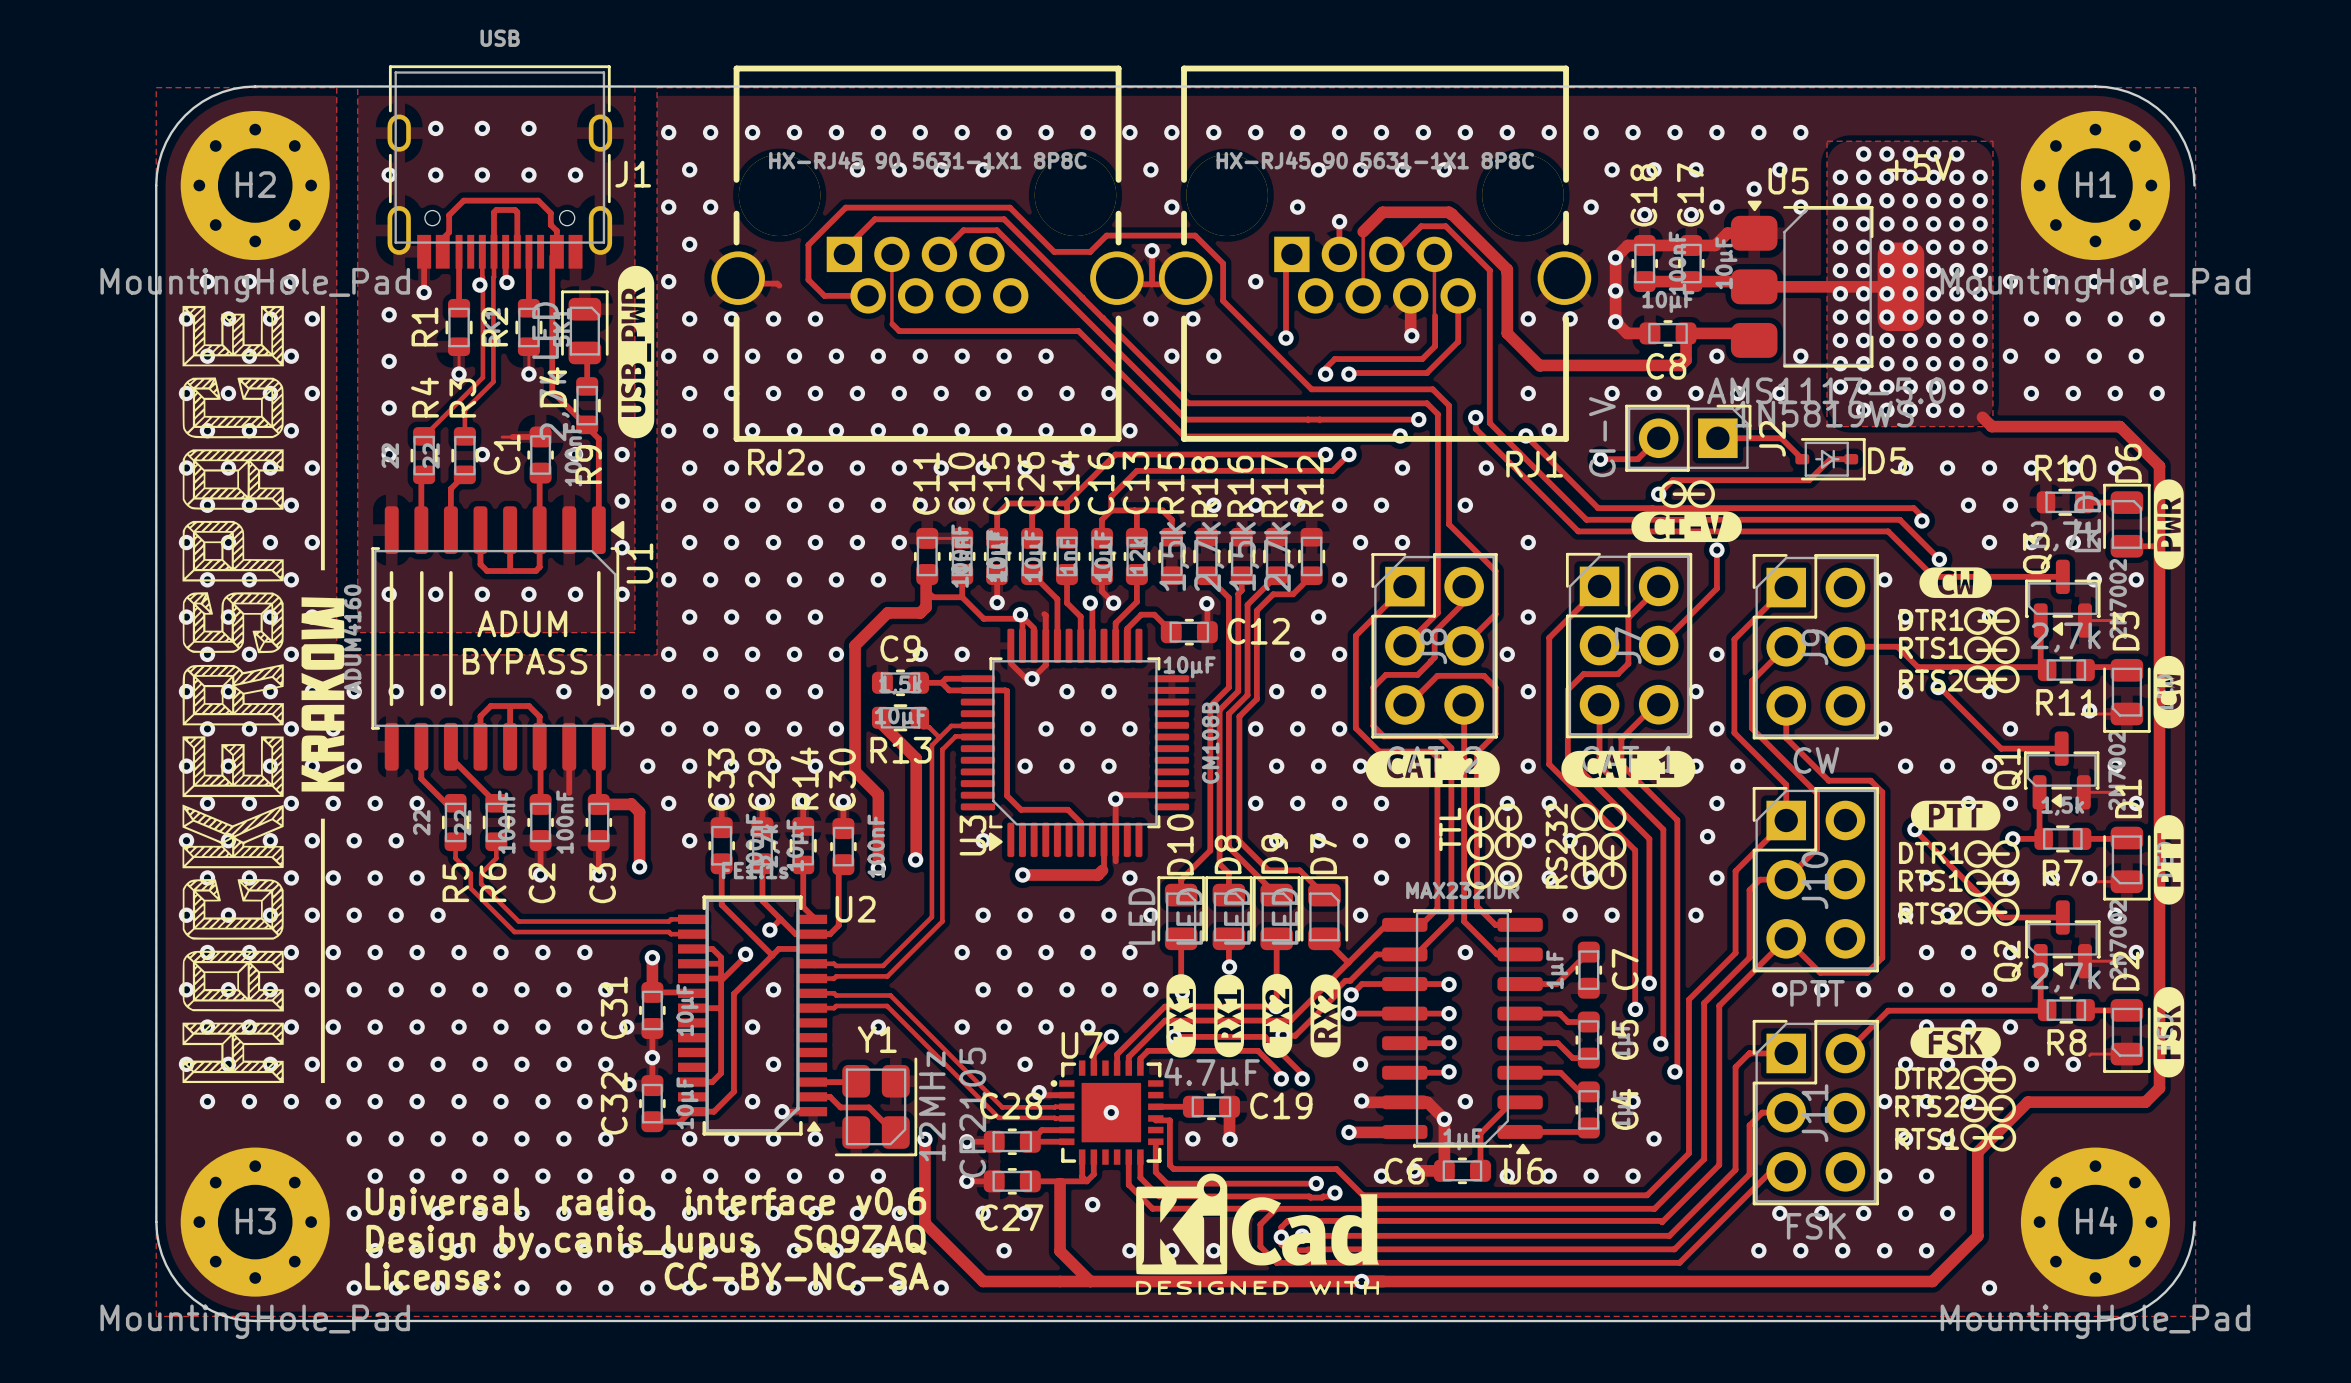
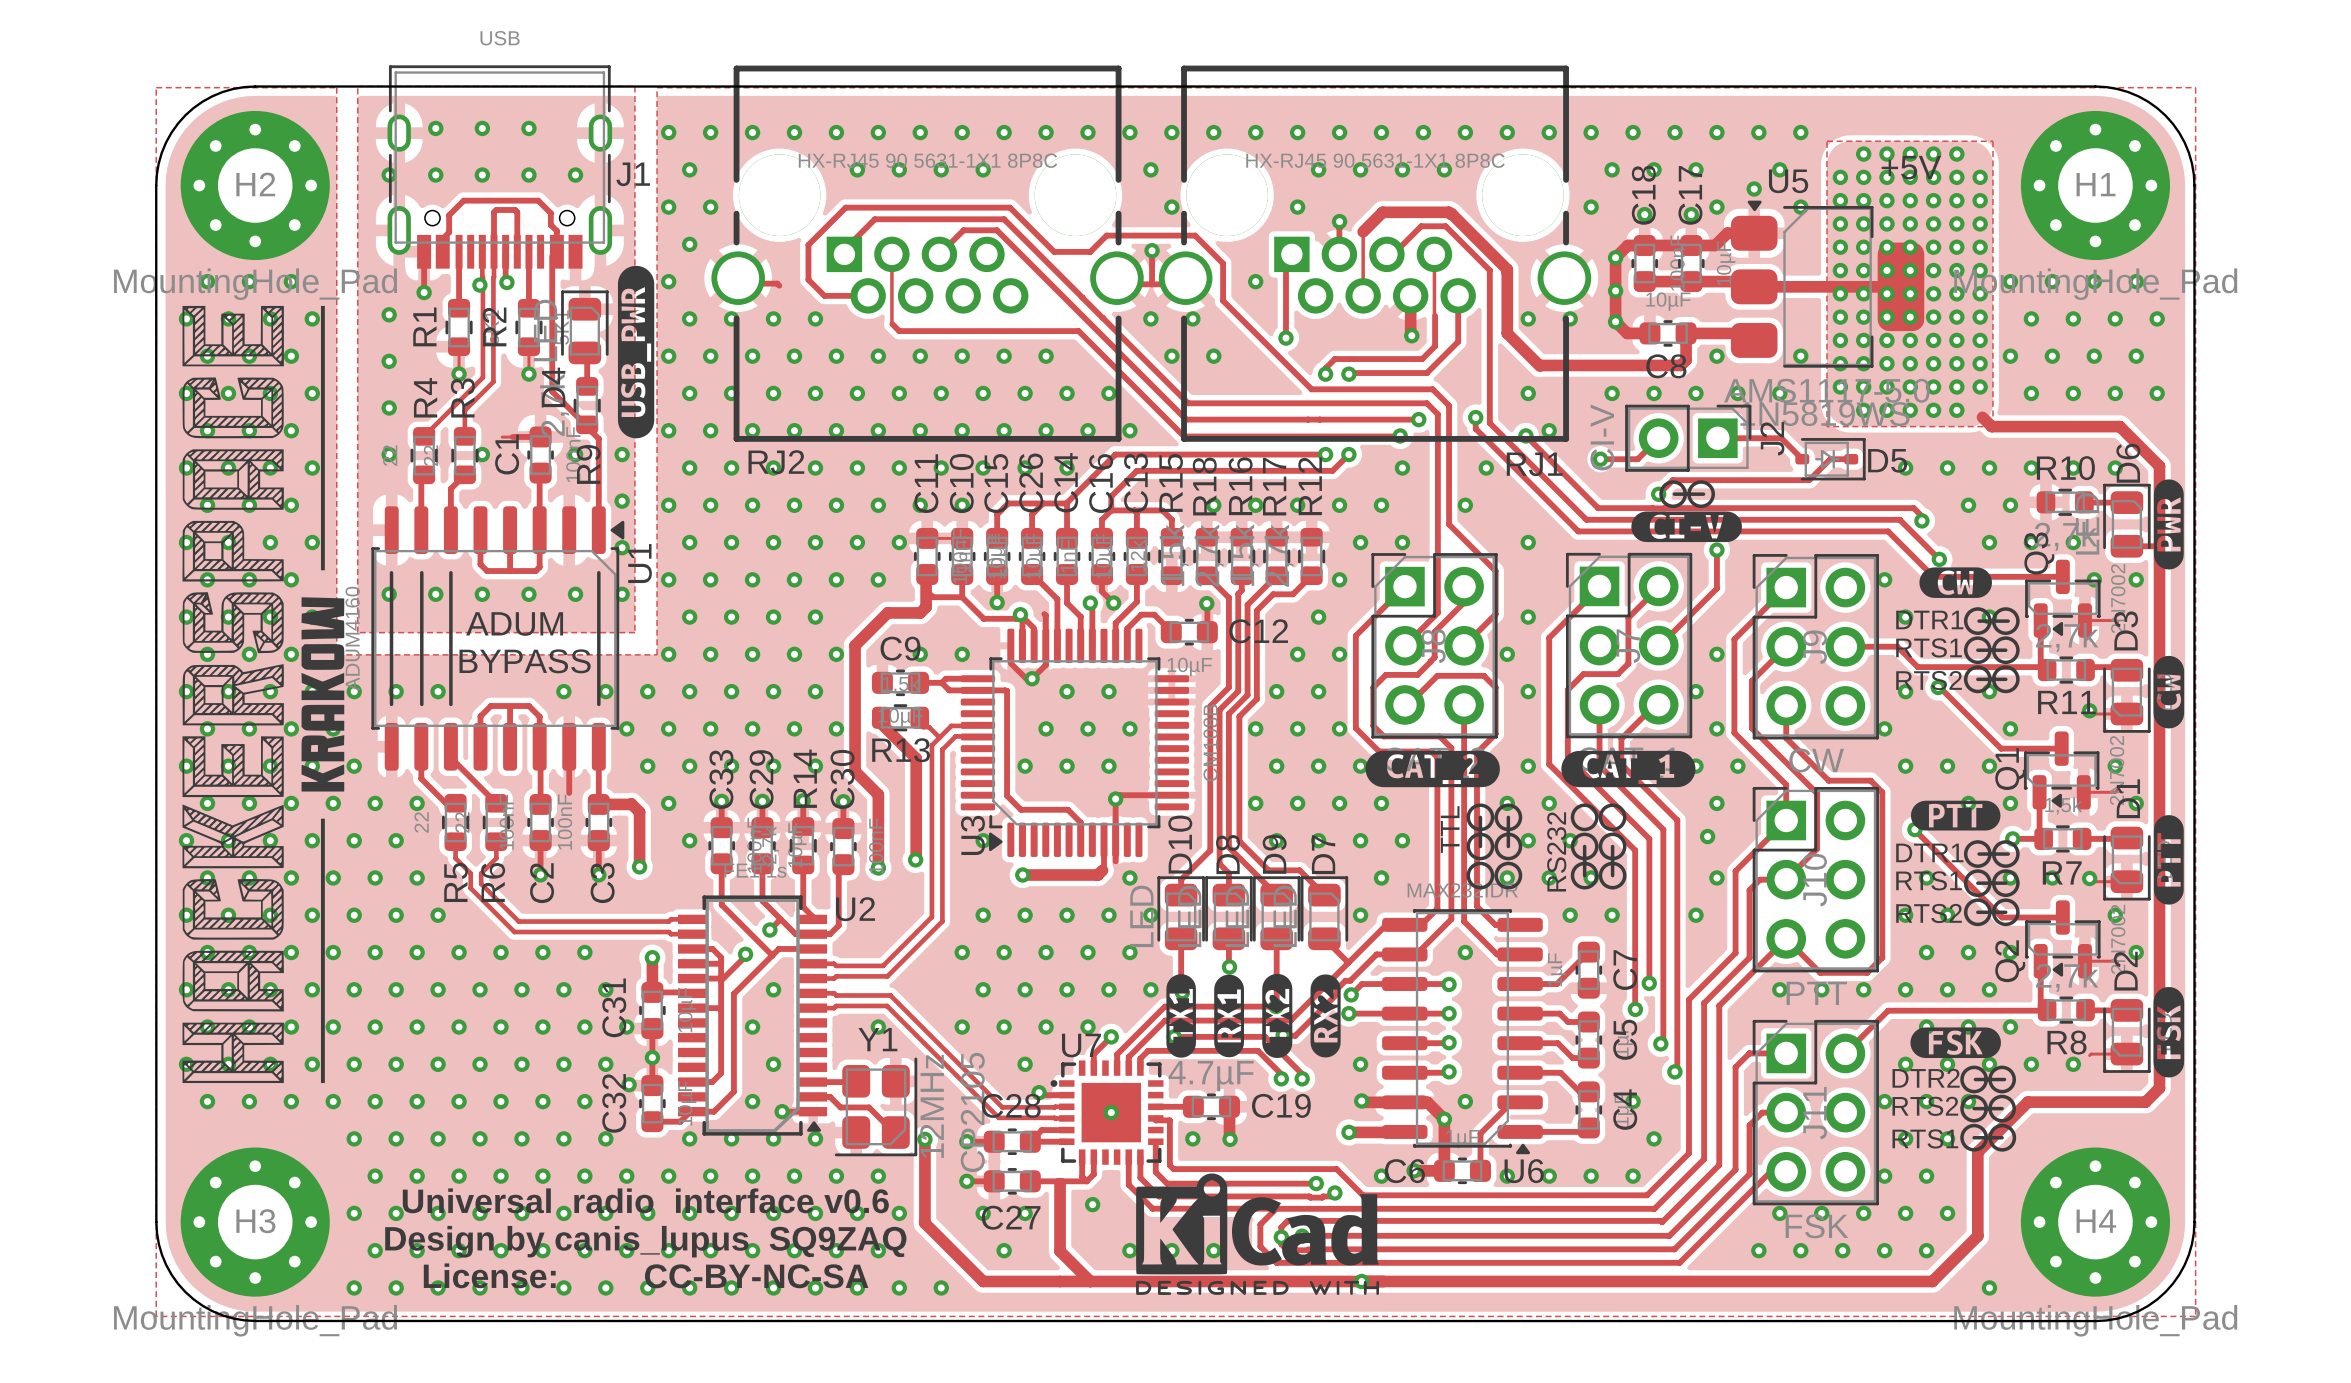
board edge: none -> (2194, 185) (2194, 1222)

